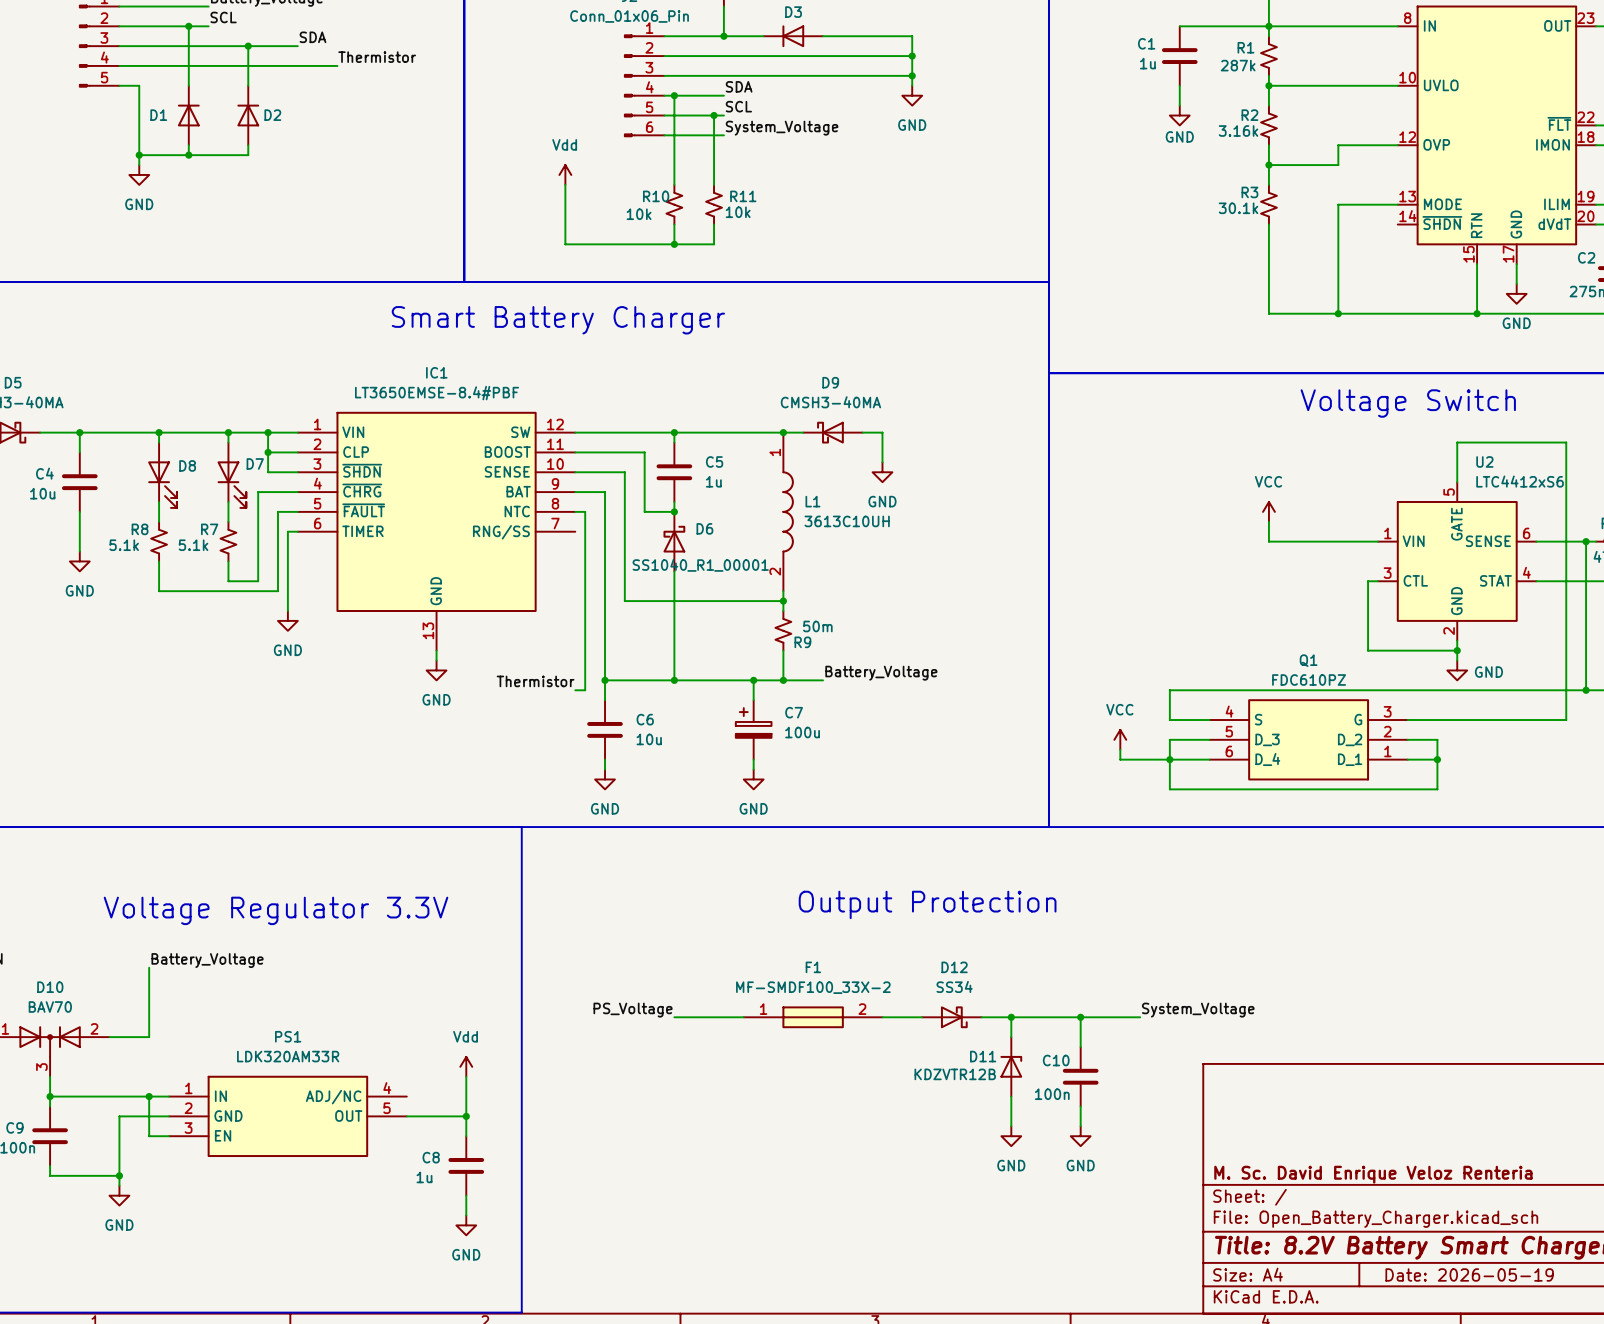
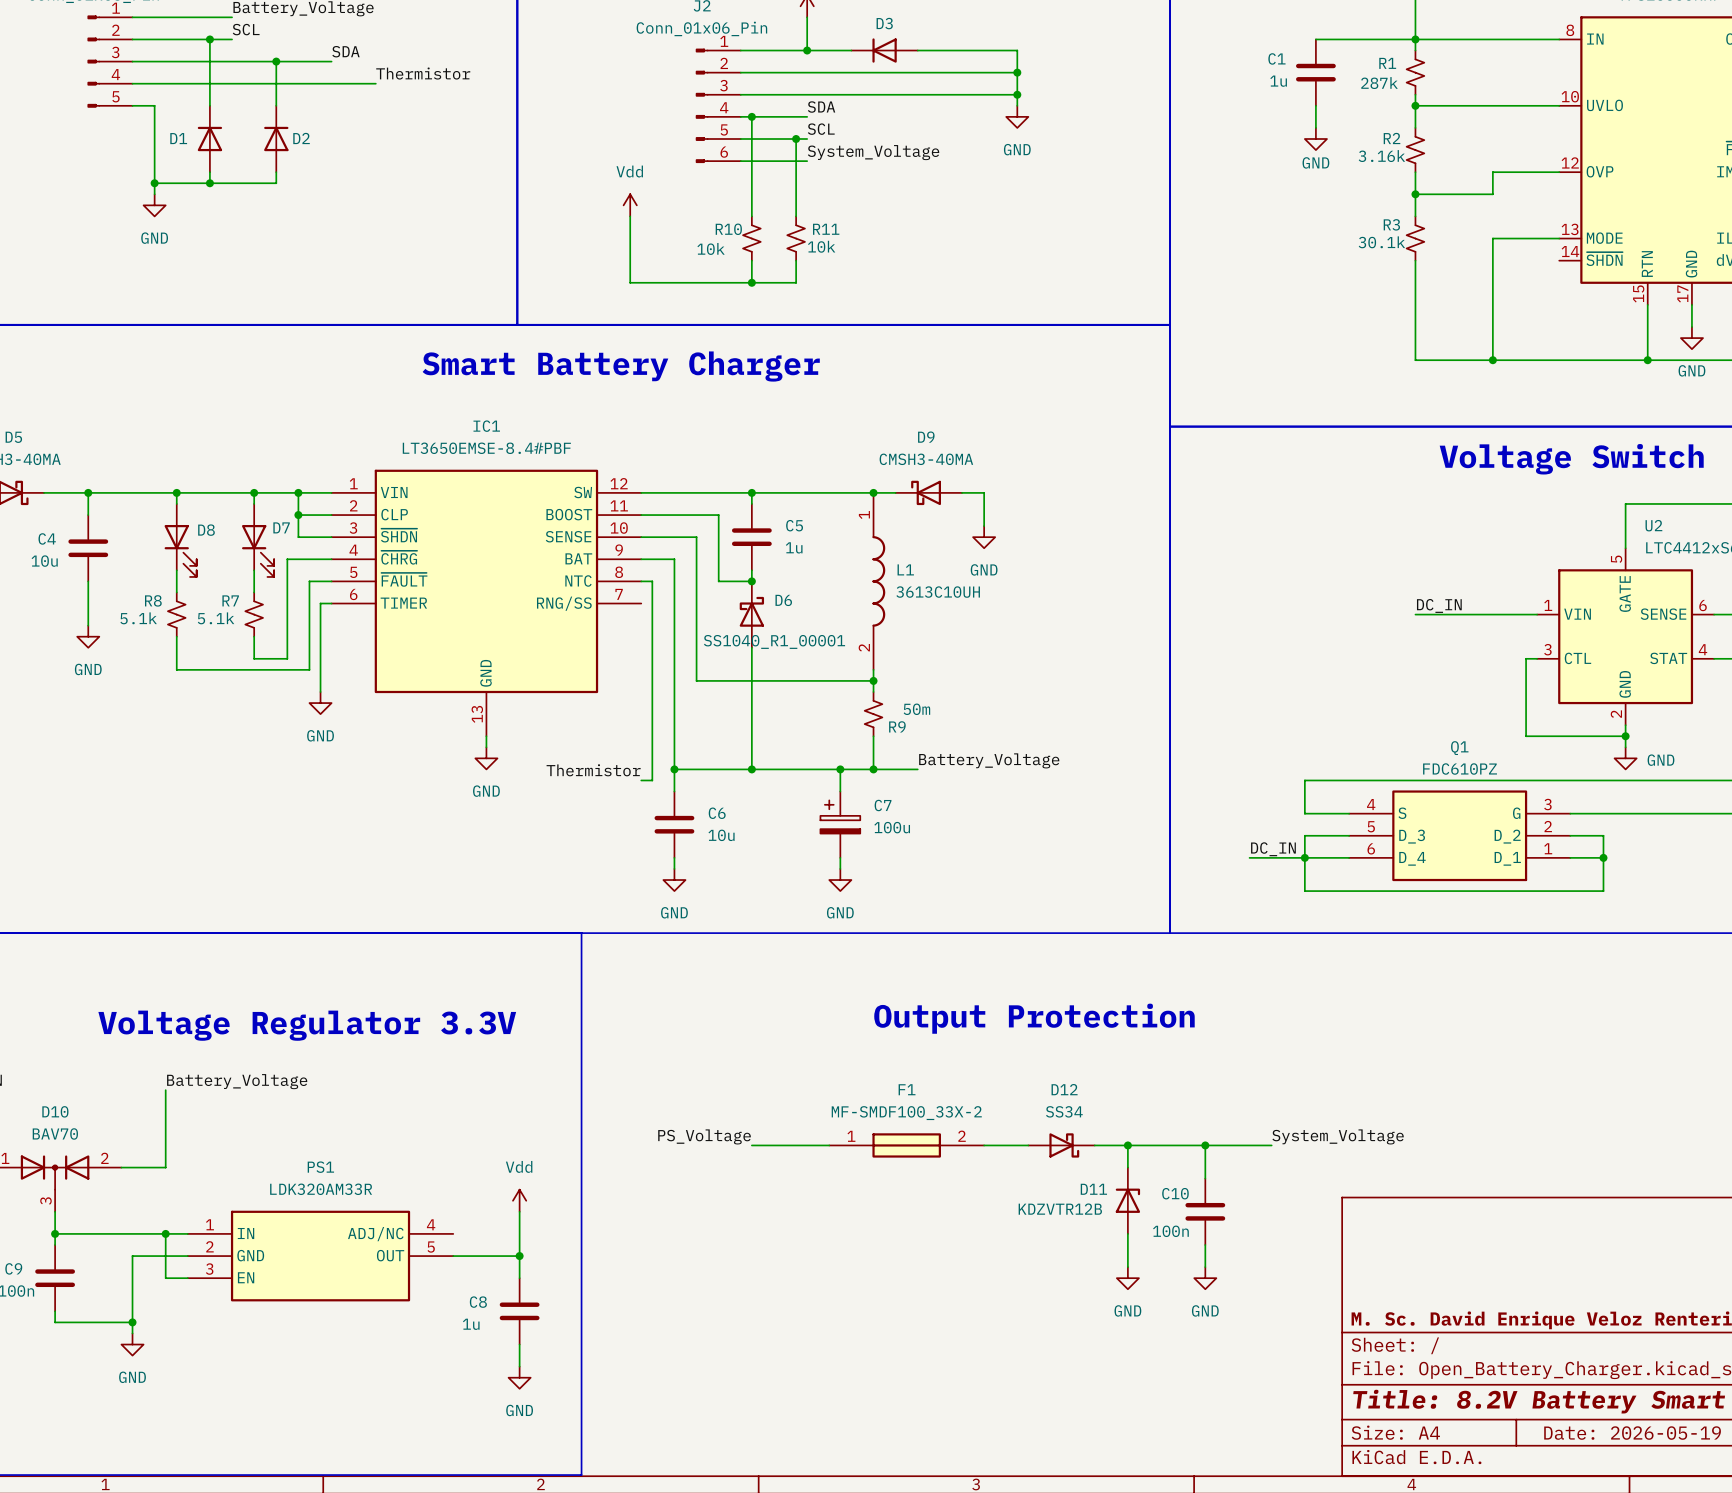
power symbol: VCC (1268, 511) -> none
wire: (1268, 521) (1268, 541) -> none
label: none -> DC_IN (1439, 605)
power symbol: VCC (1120, 739) -> none
wire: (1120, 749) (1120, 759) -> none
label: none -> DC_IN (1273, 849)

